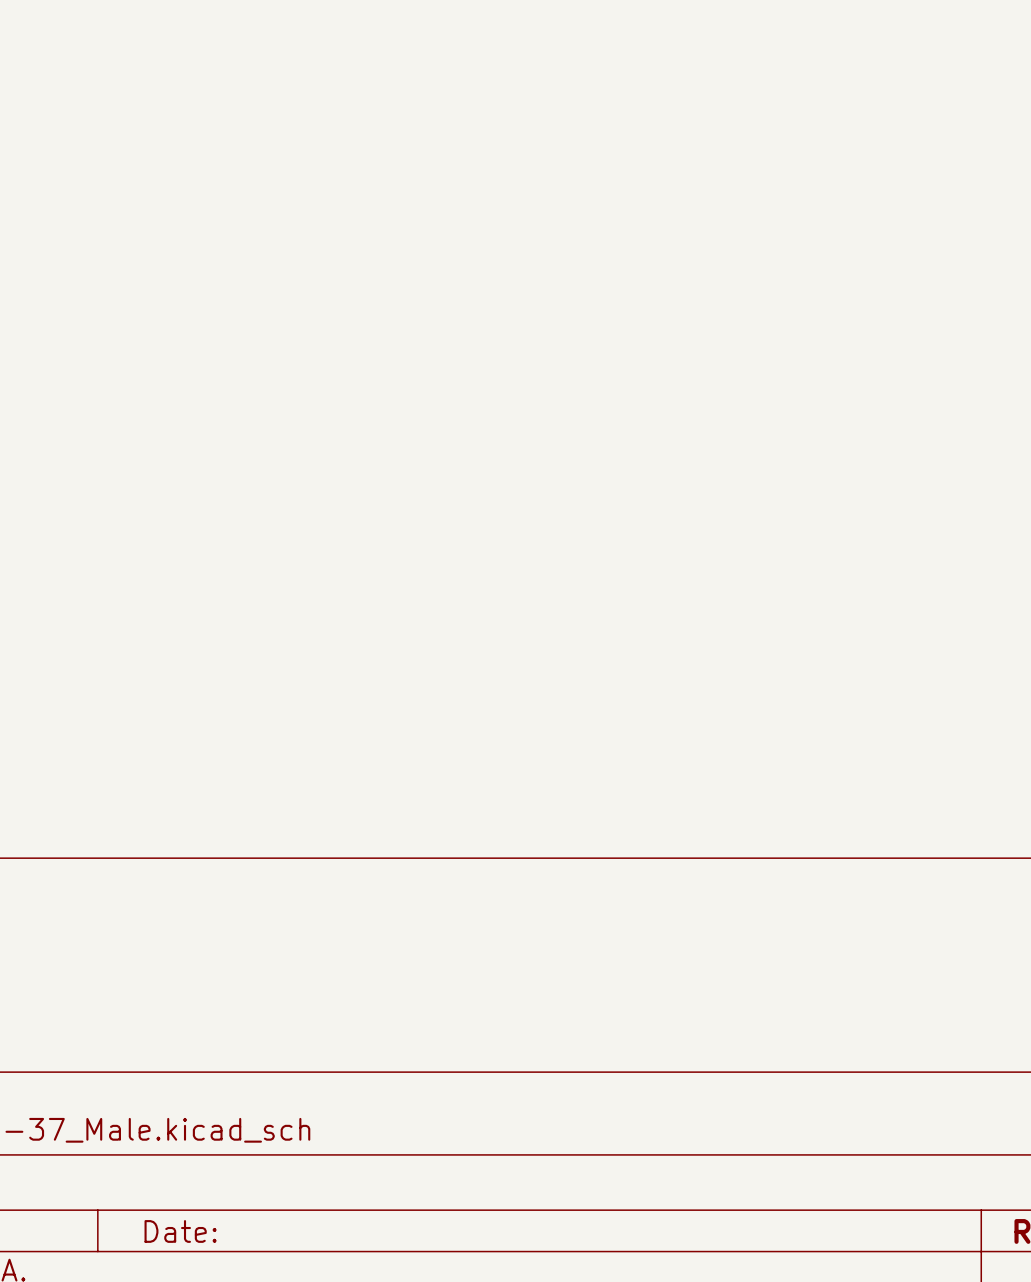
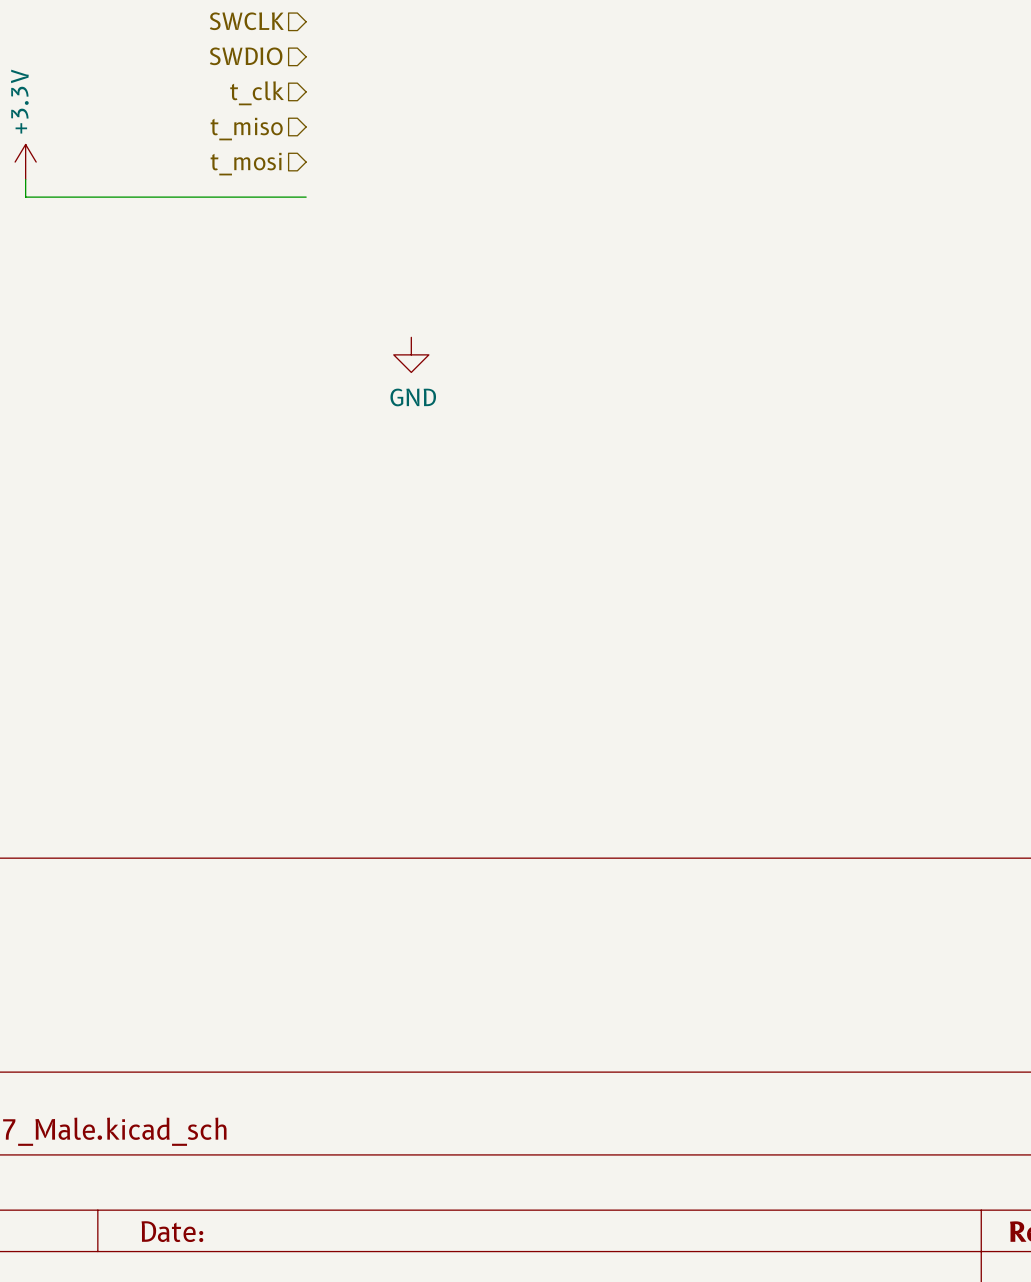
hierarchical label: none -> SWCLK (246, 21)
hierarchical label: none -> SWDIO (246, 56)
hierarchical label: none -> t_clk (257, 93)
hierarchical label: none -> t_miso (246, 129)
power symbol: none -> +3.3V (25, 162)
hierarchical label: none -> t_mosi (246, 164)
wire: none -> (25, 179) (25, 197) (306, 197)
power symbol: none -> GND (411, 354)

